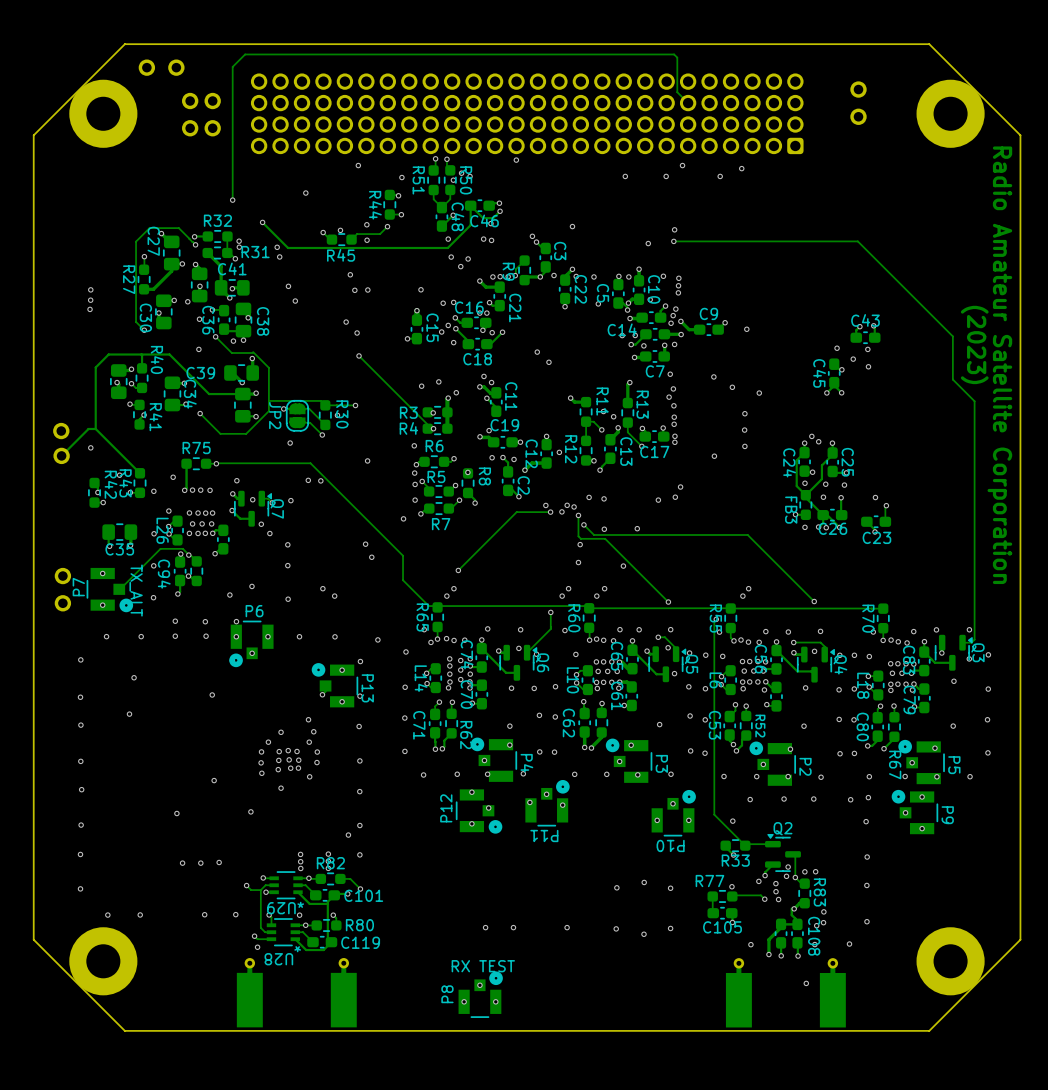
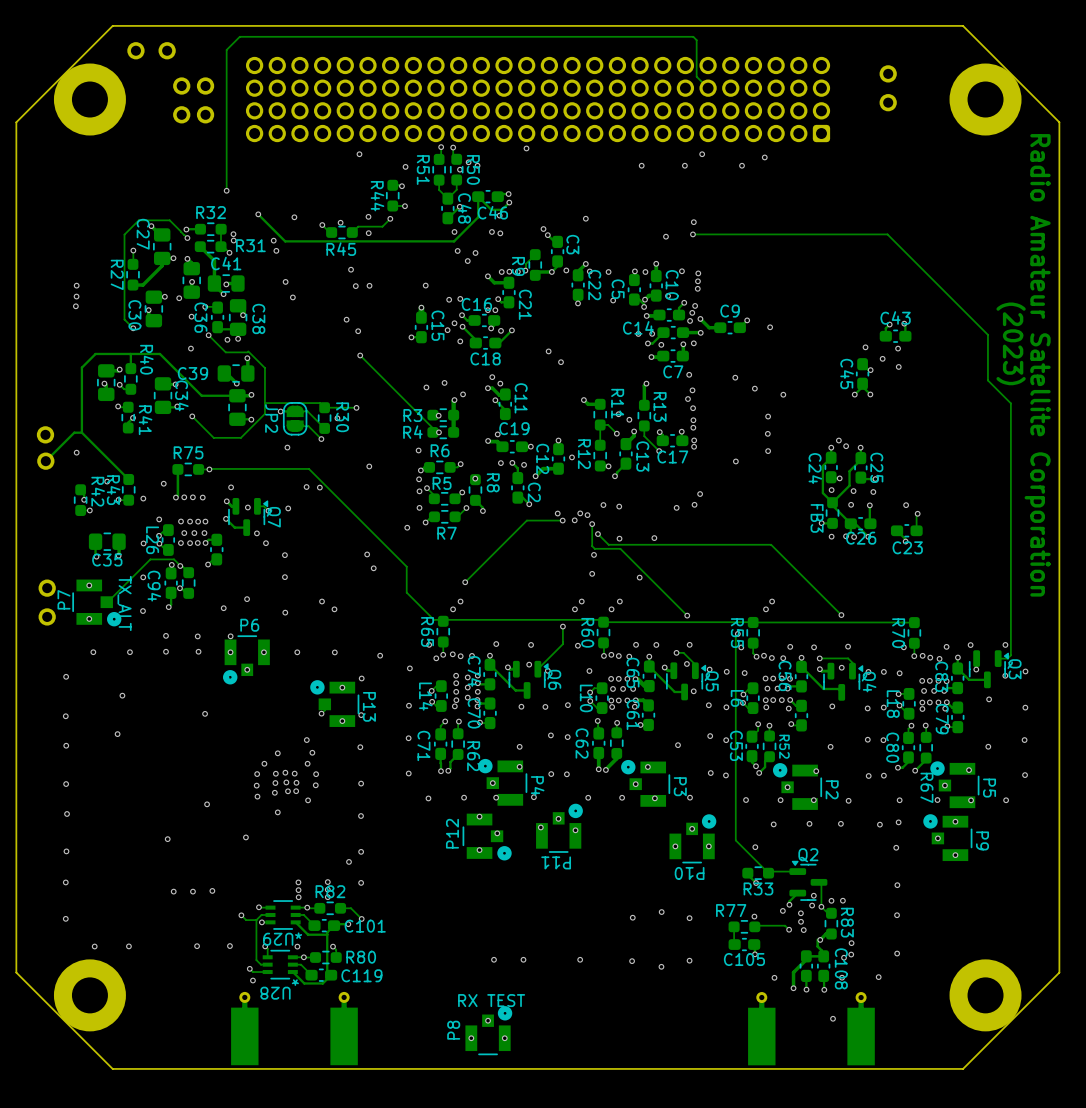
via position: (305, 193) -> (294, 217)

